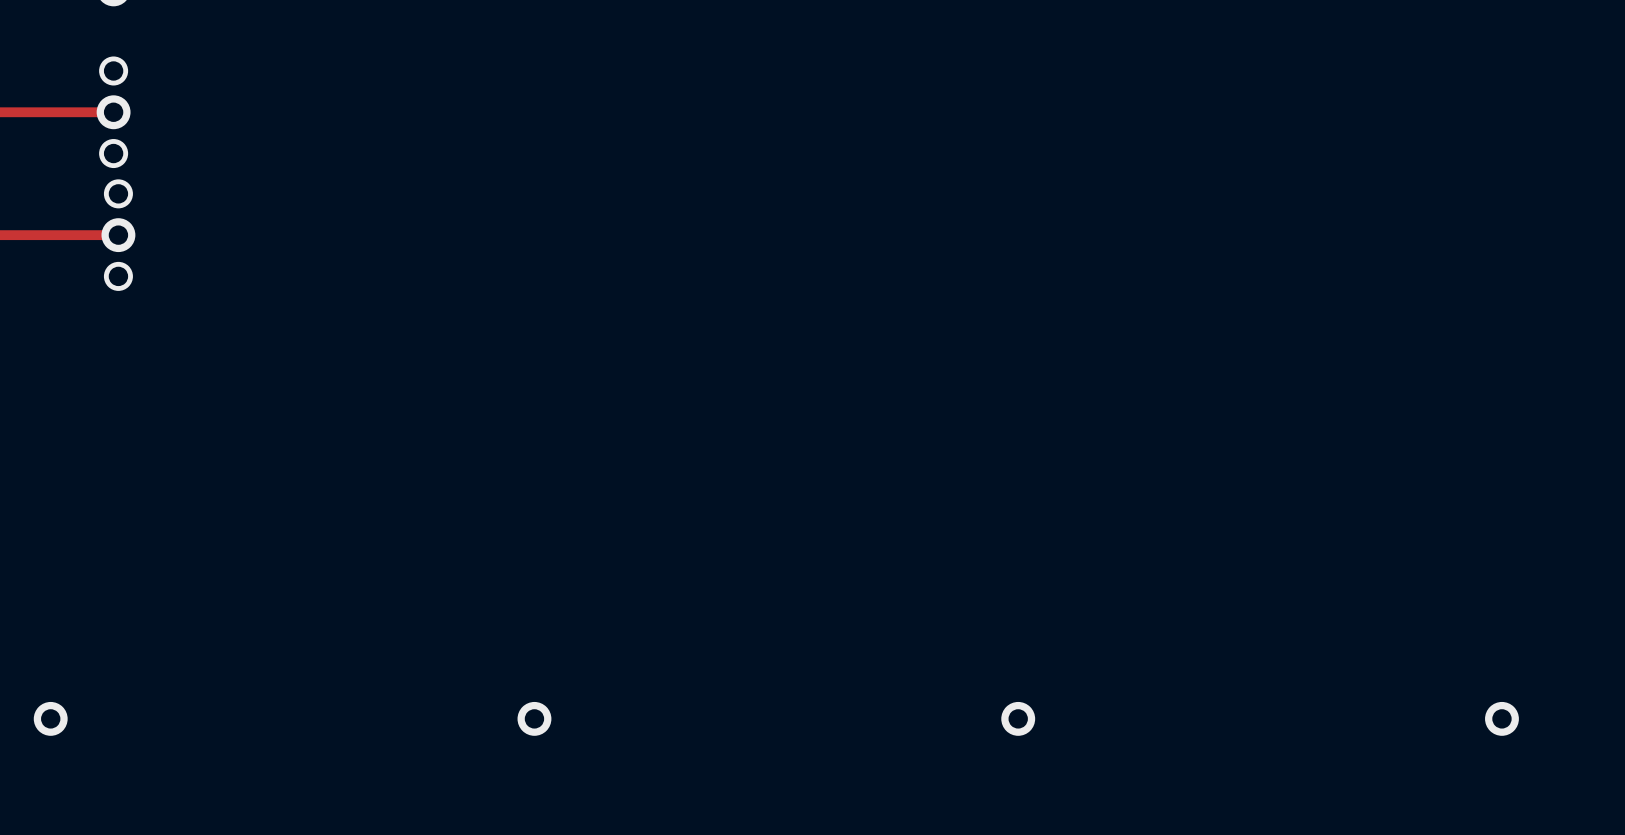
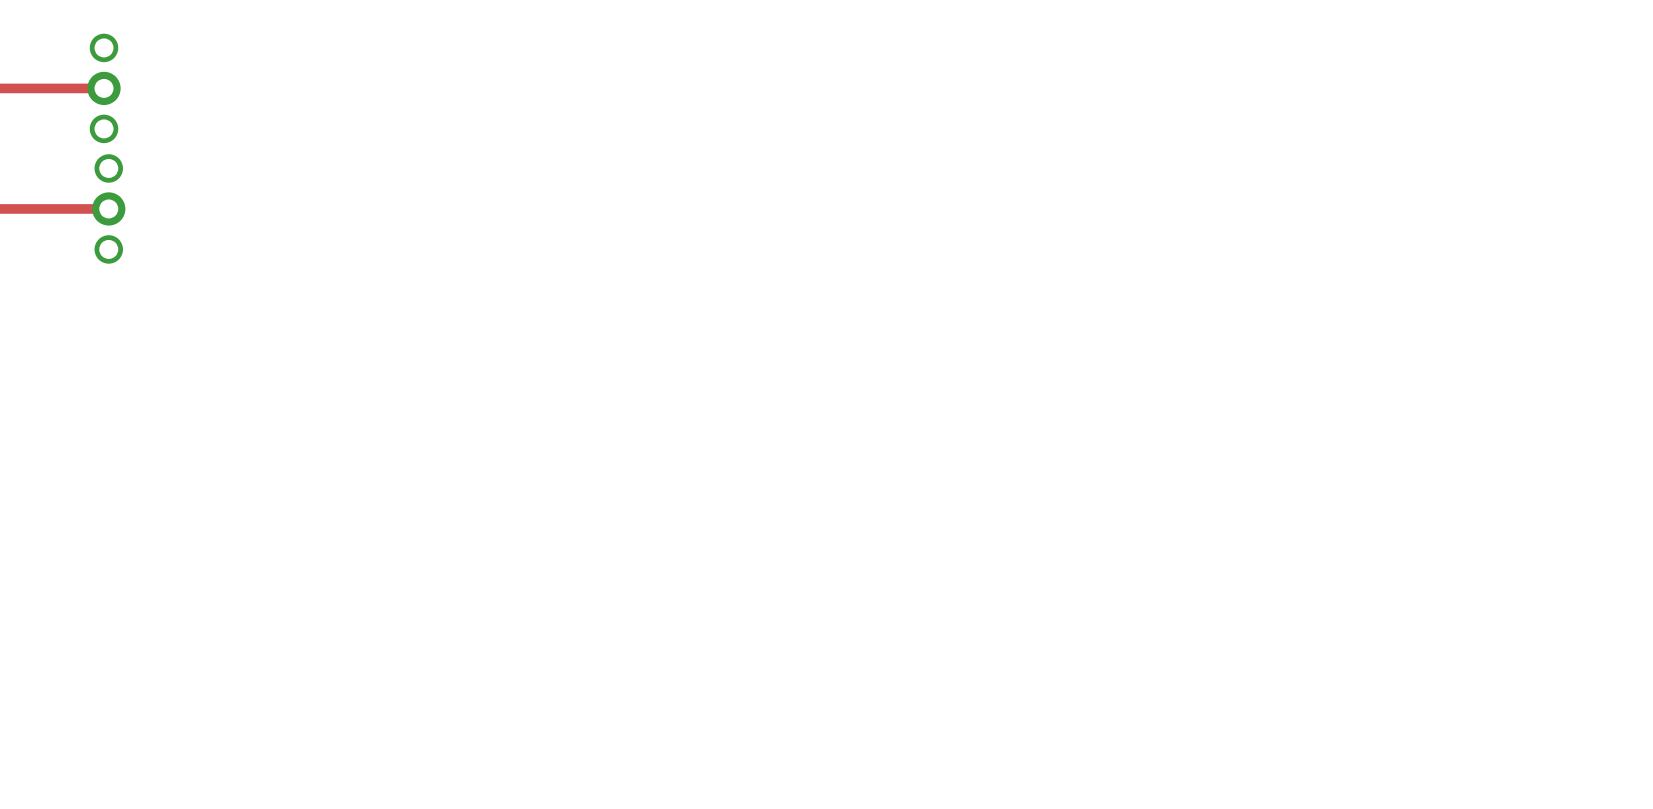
via: (50, 718) -> none
via: (534, 718) -> none
via: (1018, 718) -> none
via: (1501, 718) -> none

